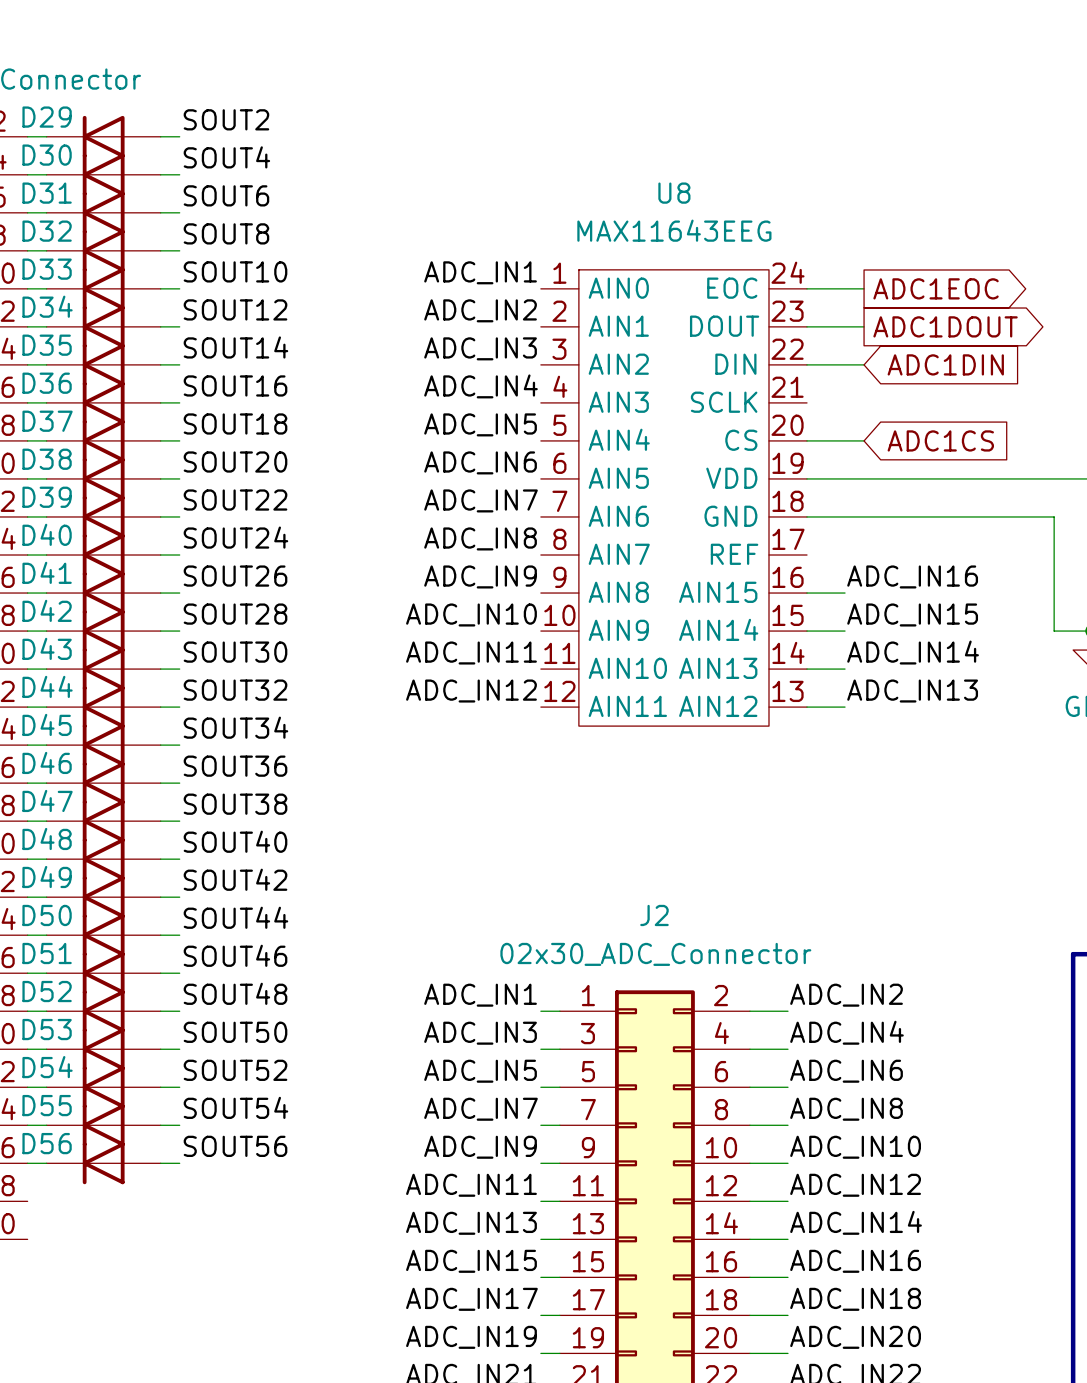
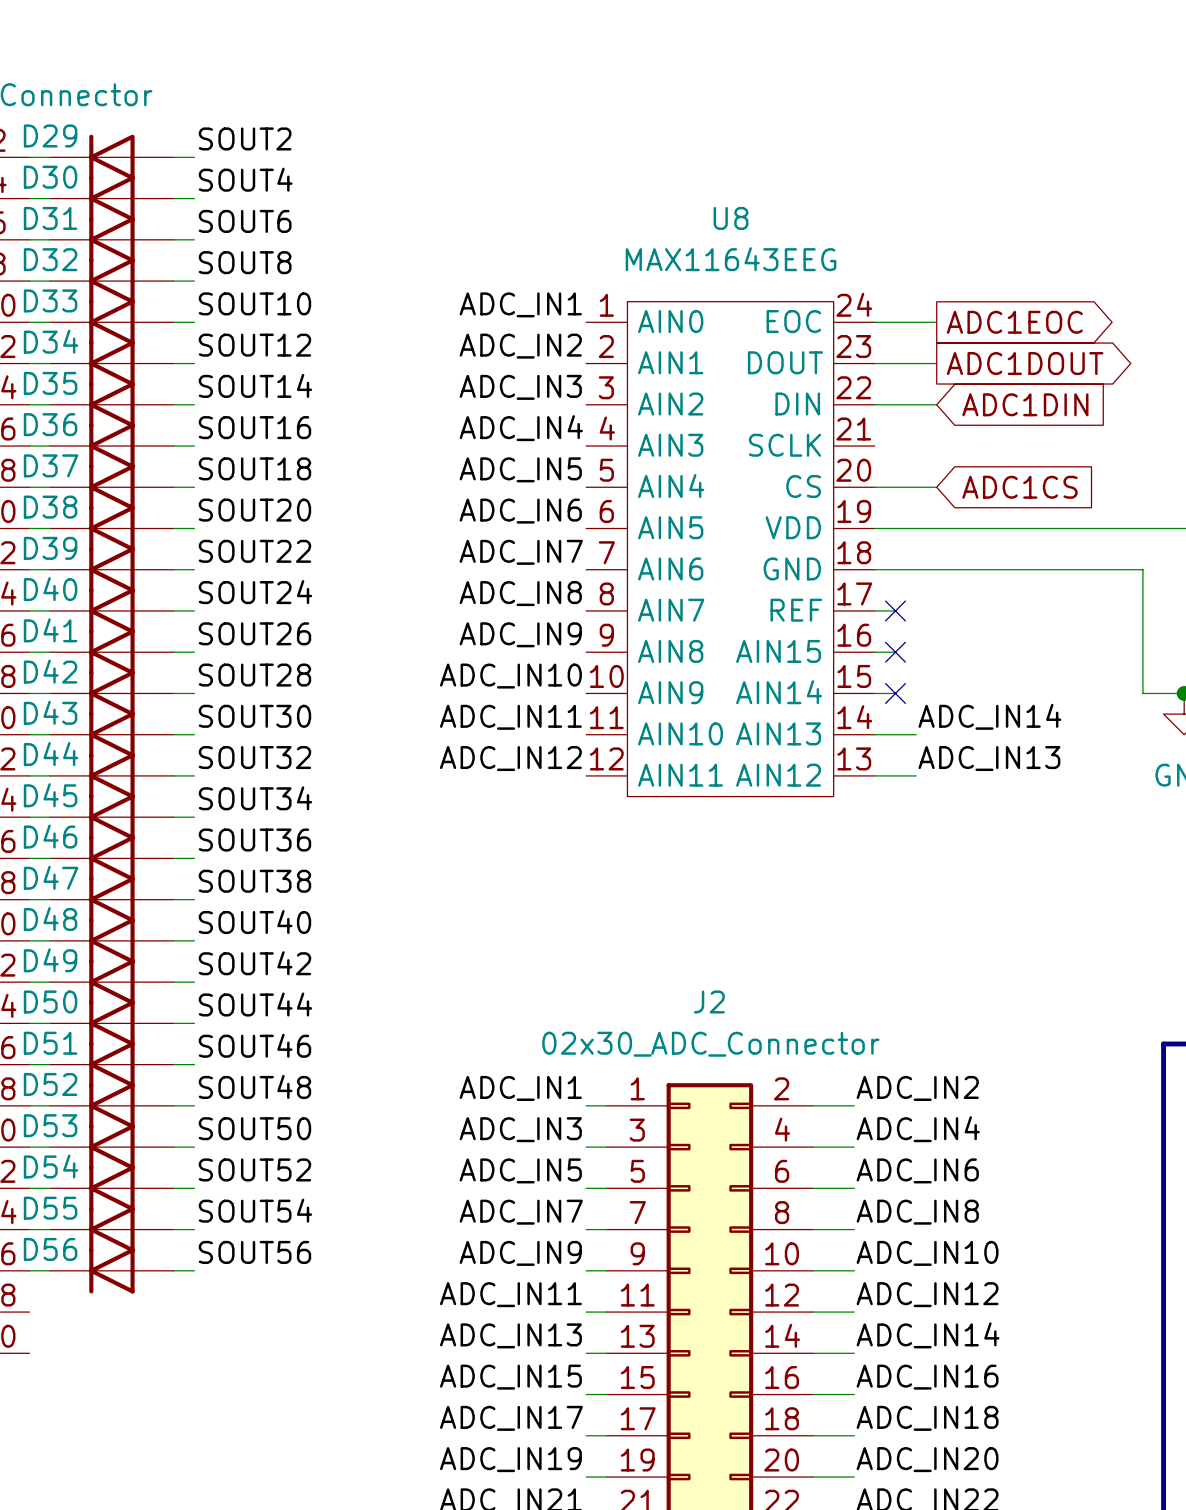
no-connect mark: none -> (895, 610)
label: ADC_IN16 (912, 576) -> none
wire: (826, 593) (845, 593) -> (874, 610) (895, 610)
no-connect mark: none -> (895, 652)
label: ADC_IN15 (912, 614) -> none
wire: (826, 631) (845, 631) -> none
no-connect mark: none -> (895, 693)

